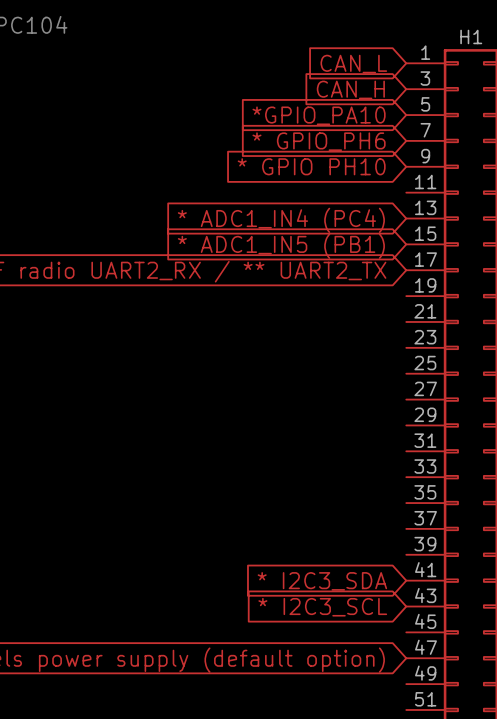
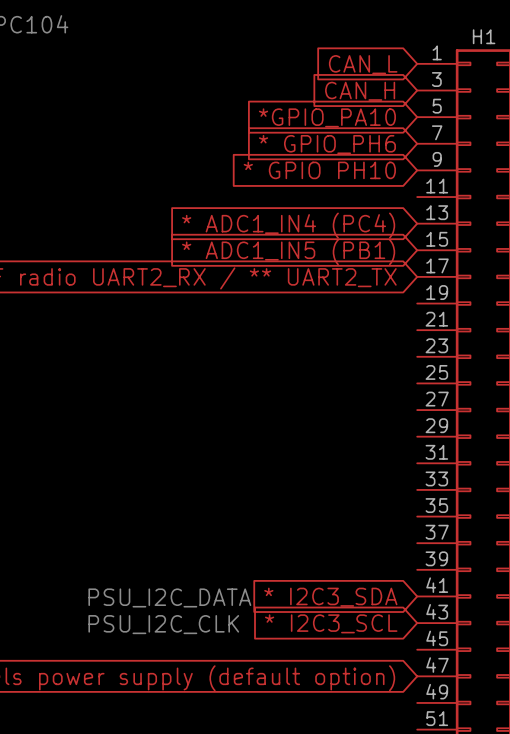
text: none -> PSU_I2C_DATA (169, 597)
text: none -> PSU_I2C_CLK (163, 624)

